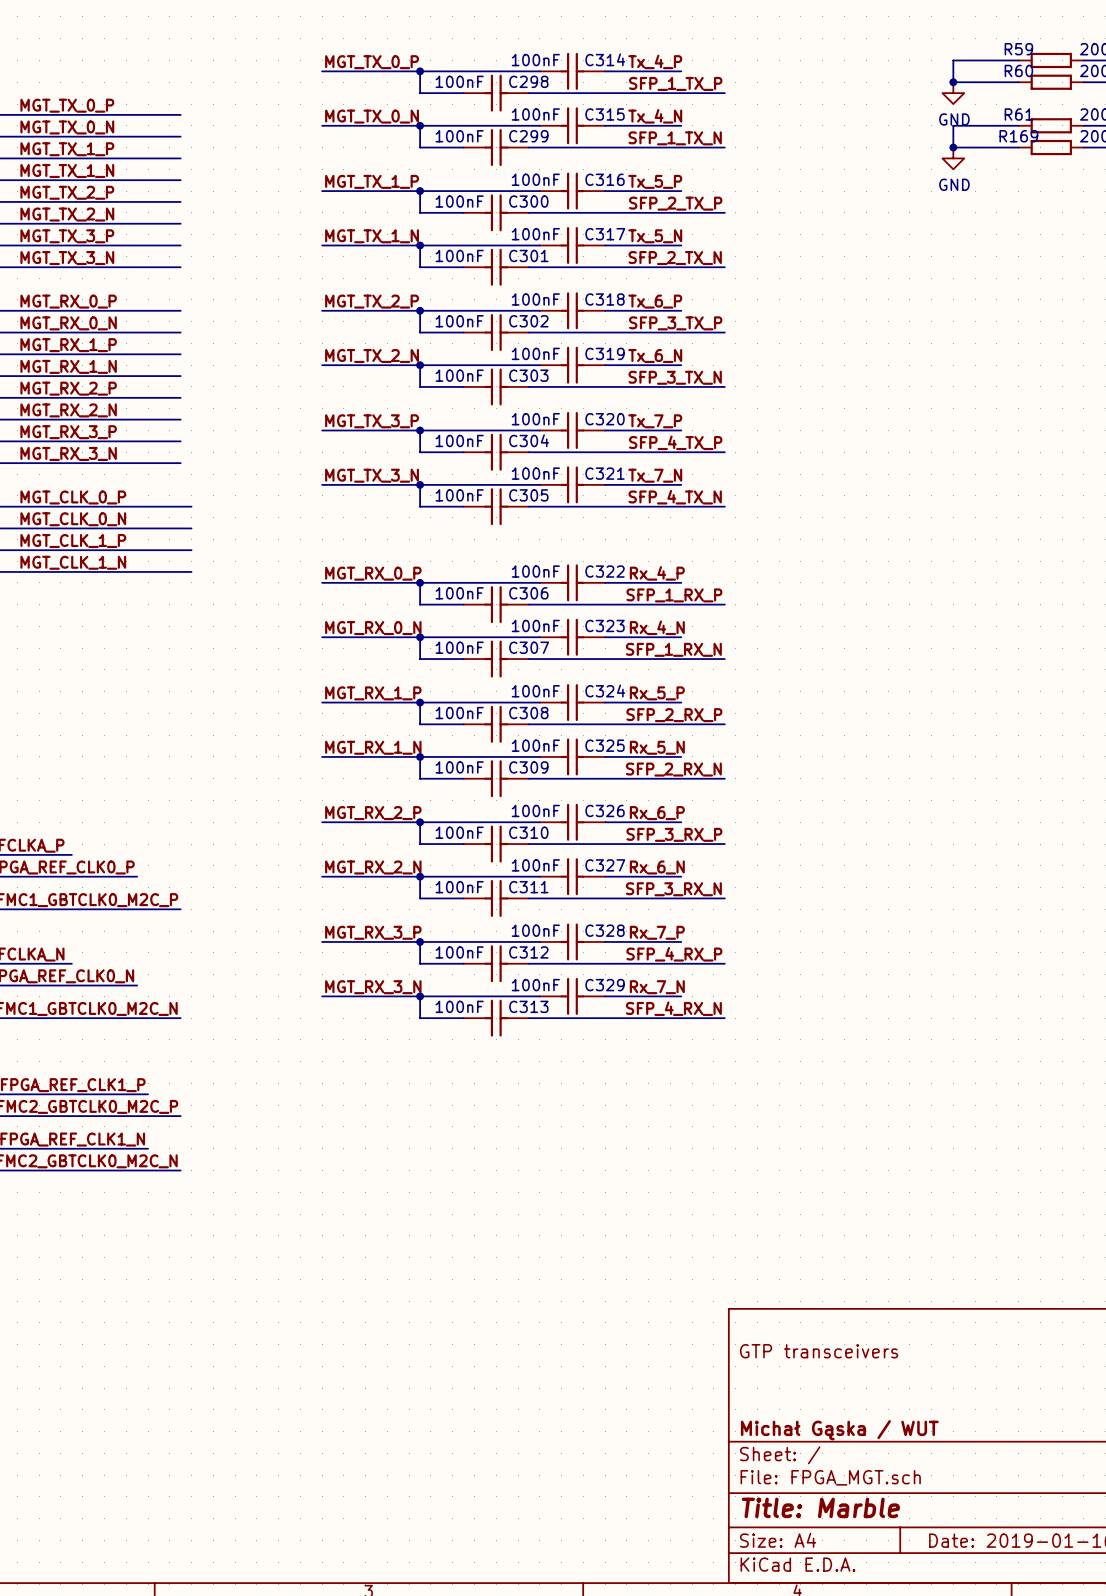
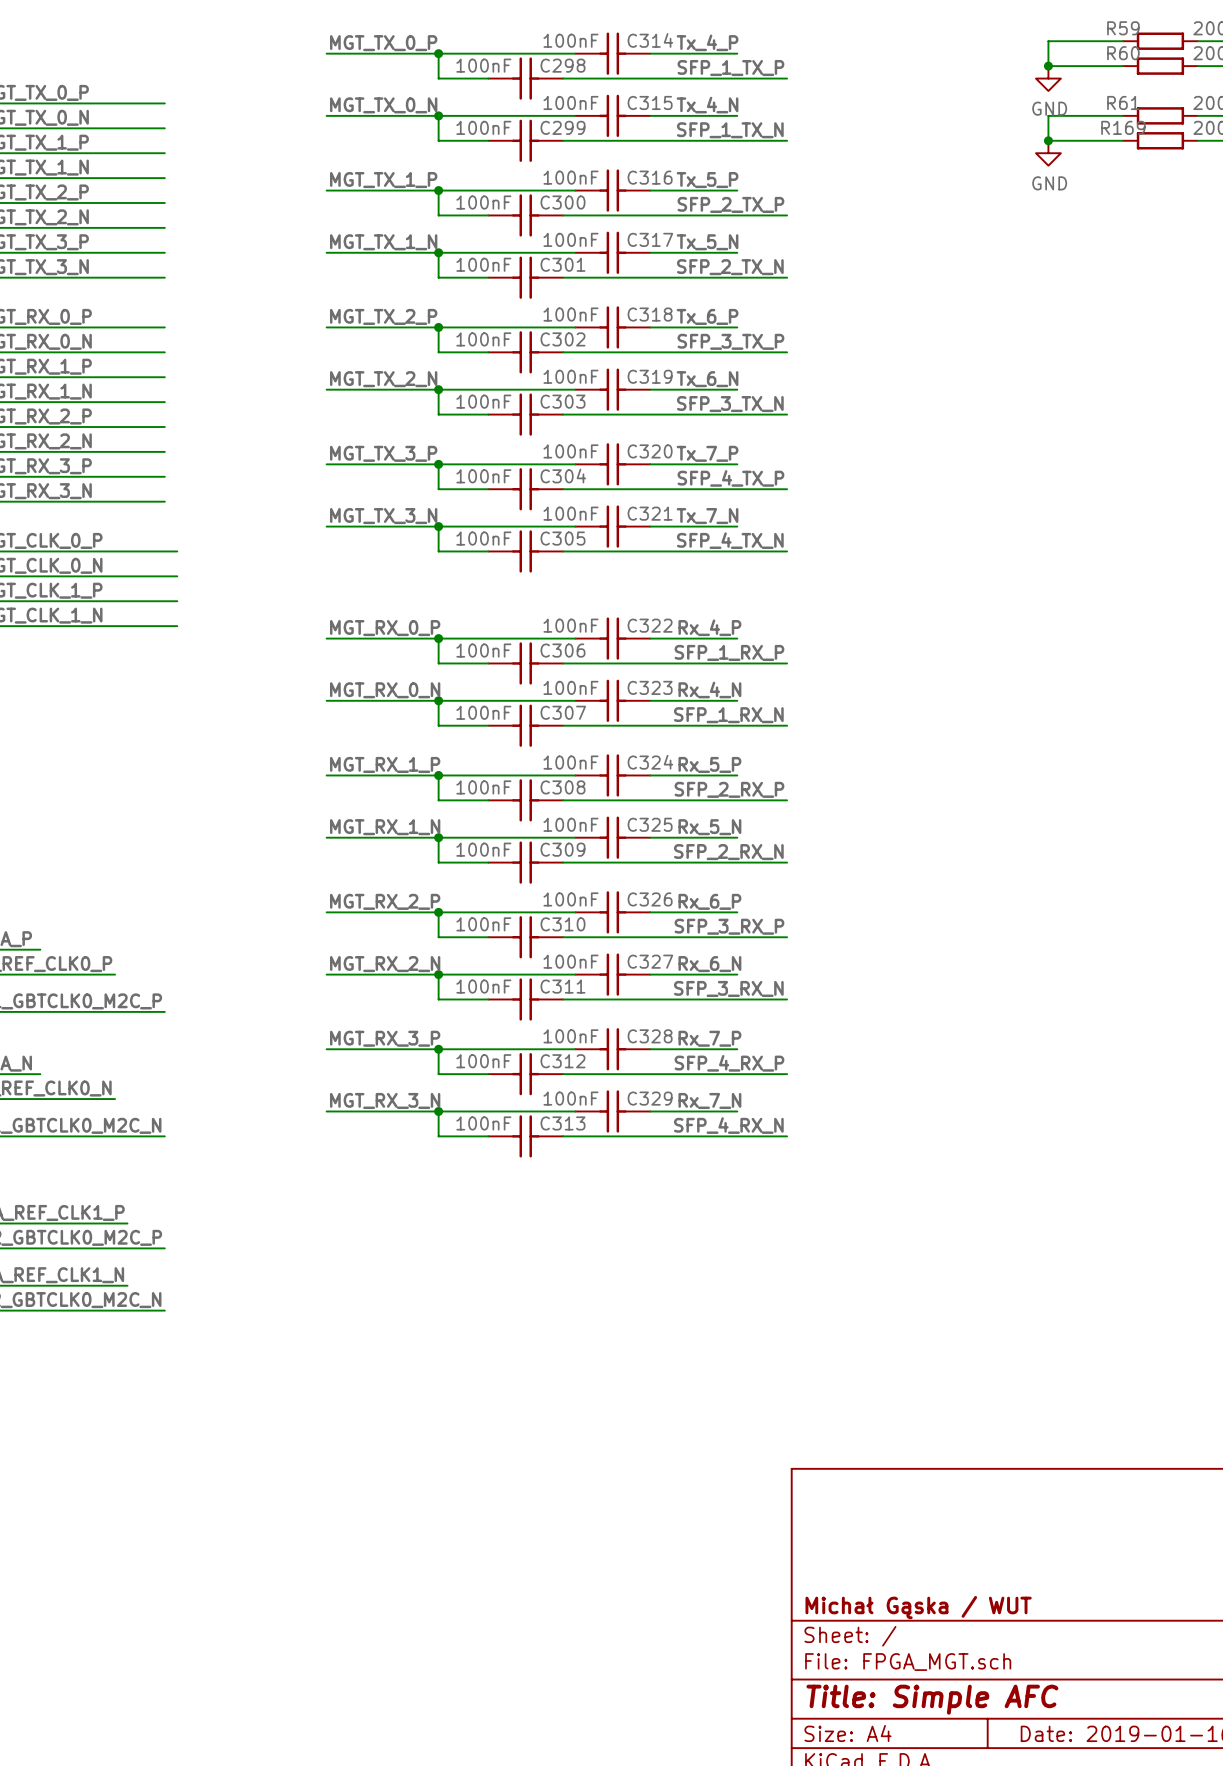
title block: GTP transceivers (819, 1351) -> none
title block: Title: Marble (820, 1507) -> Title: Simple AFC (932, 1699)

